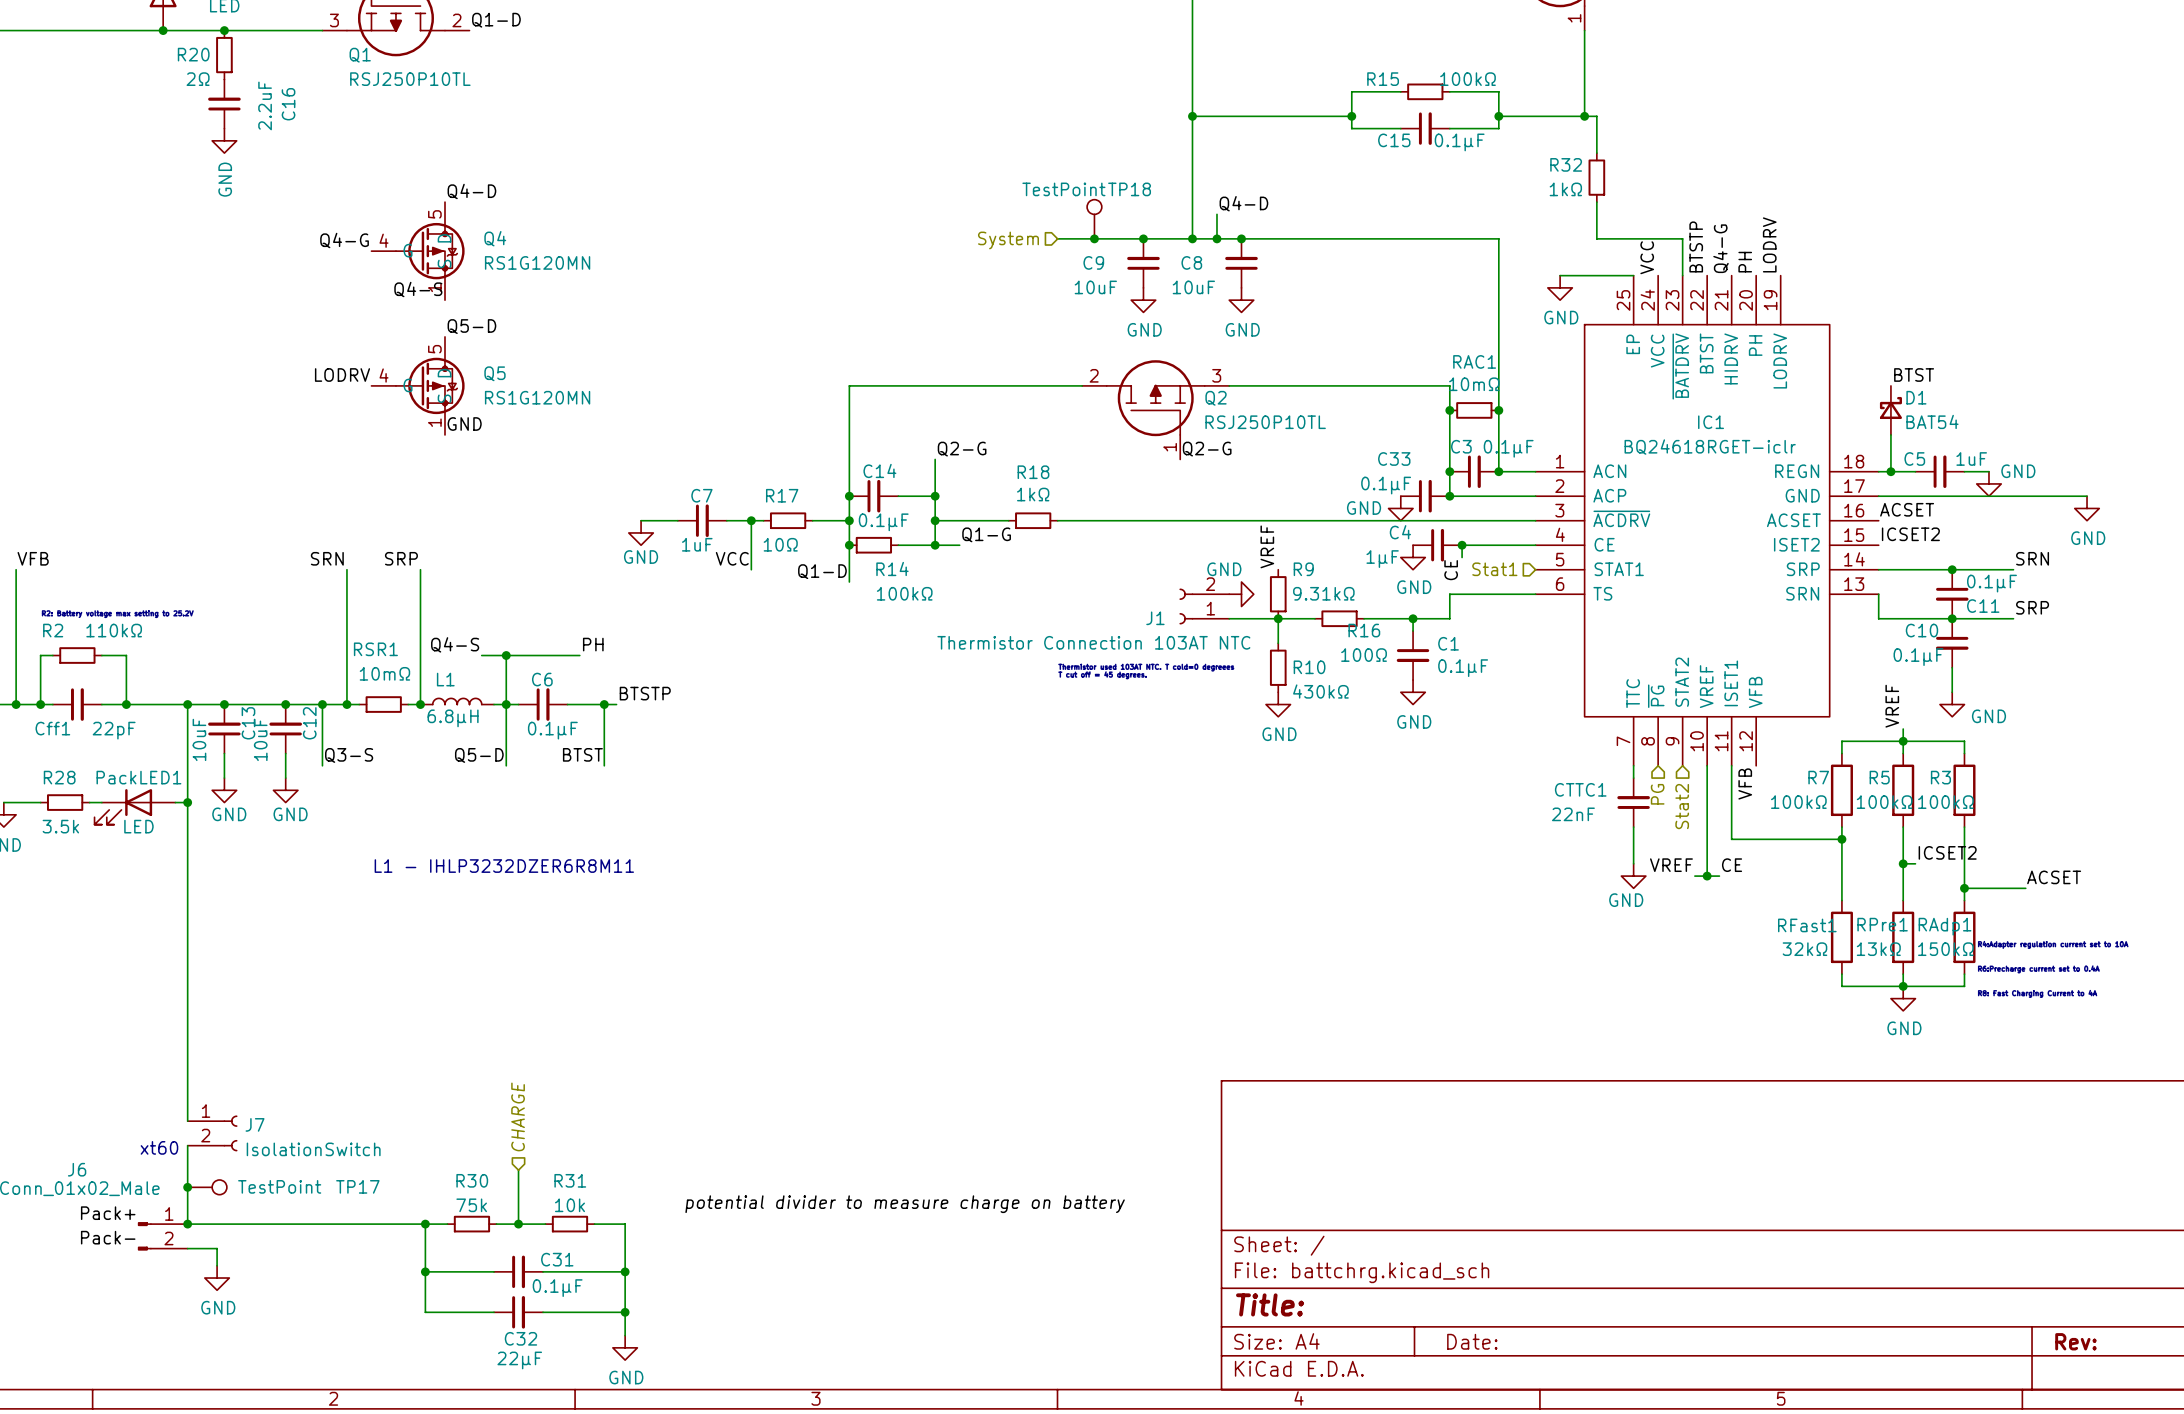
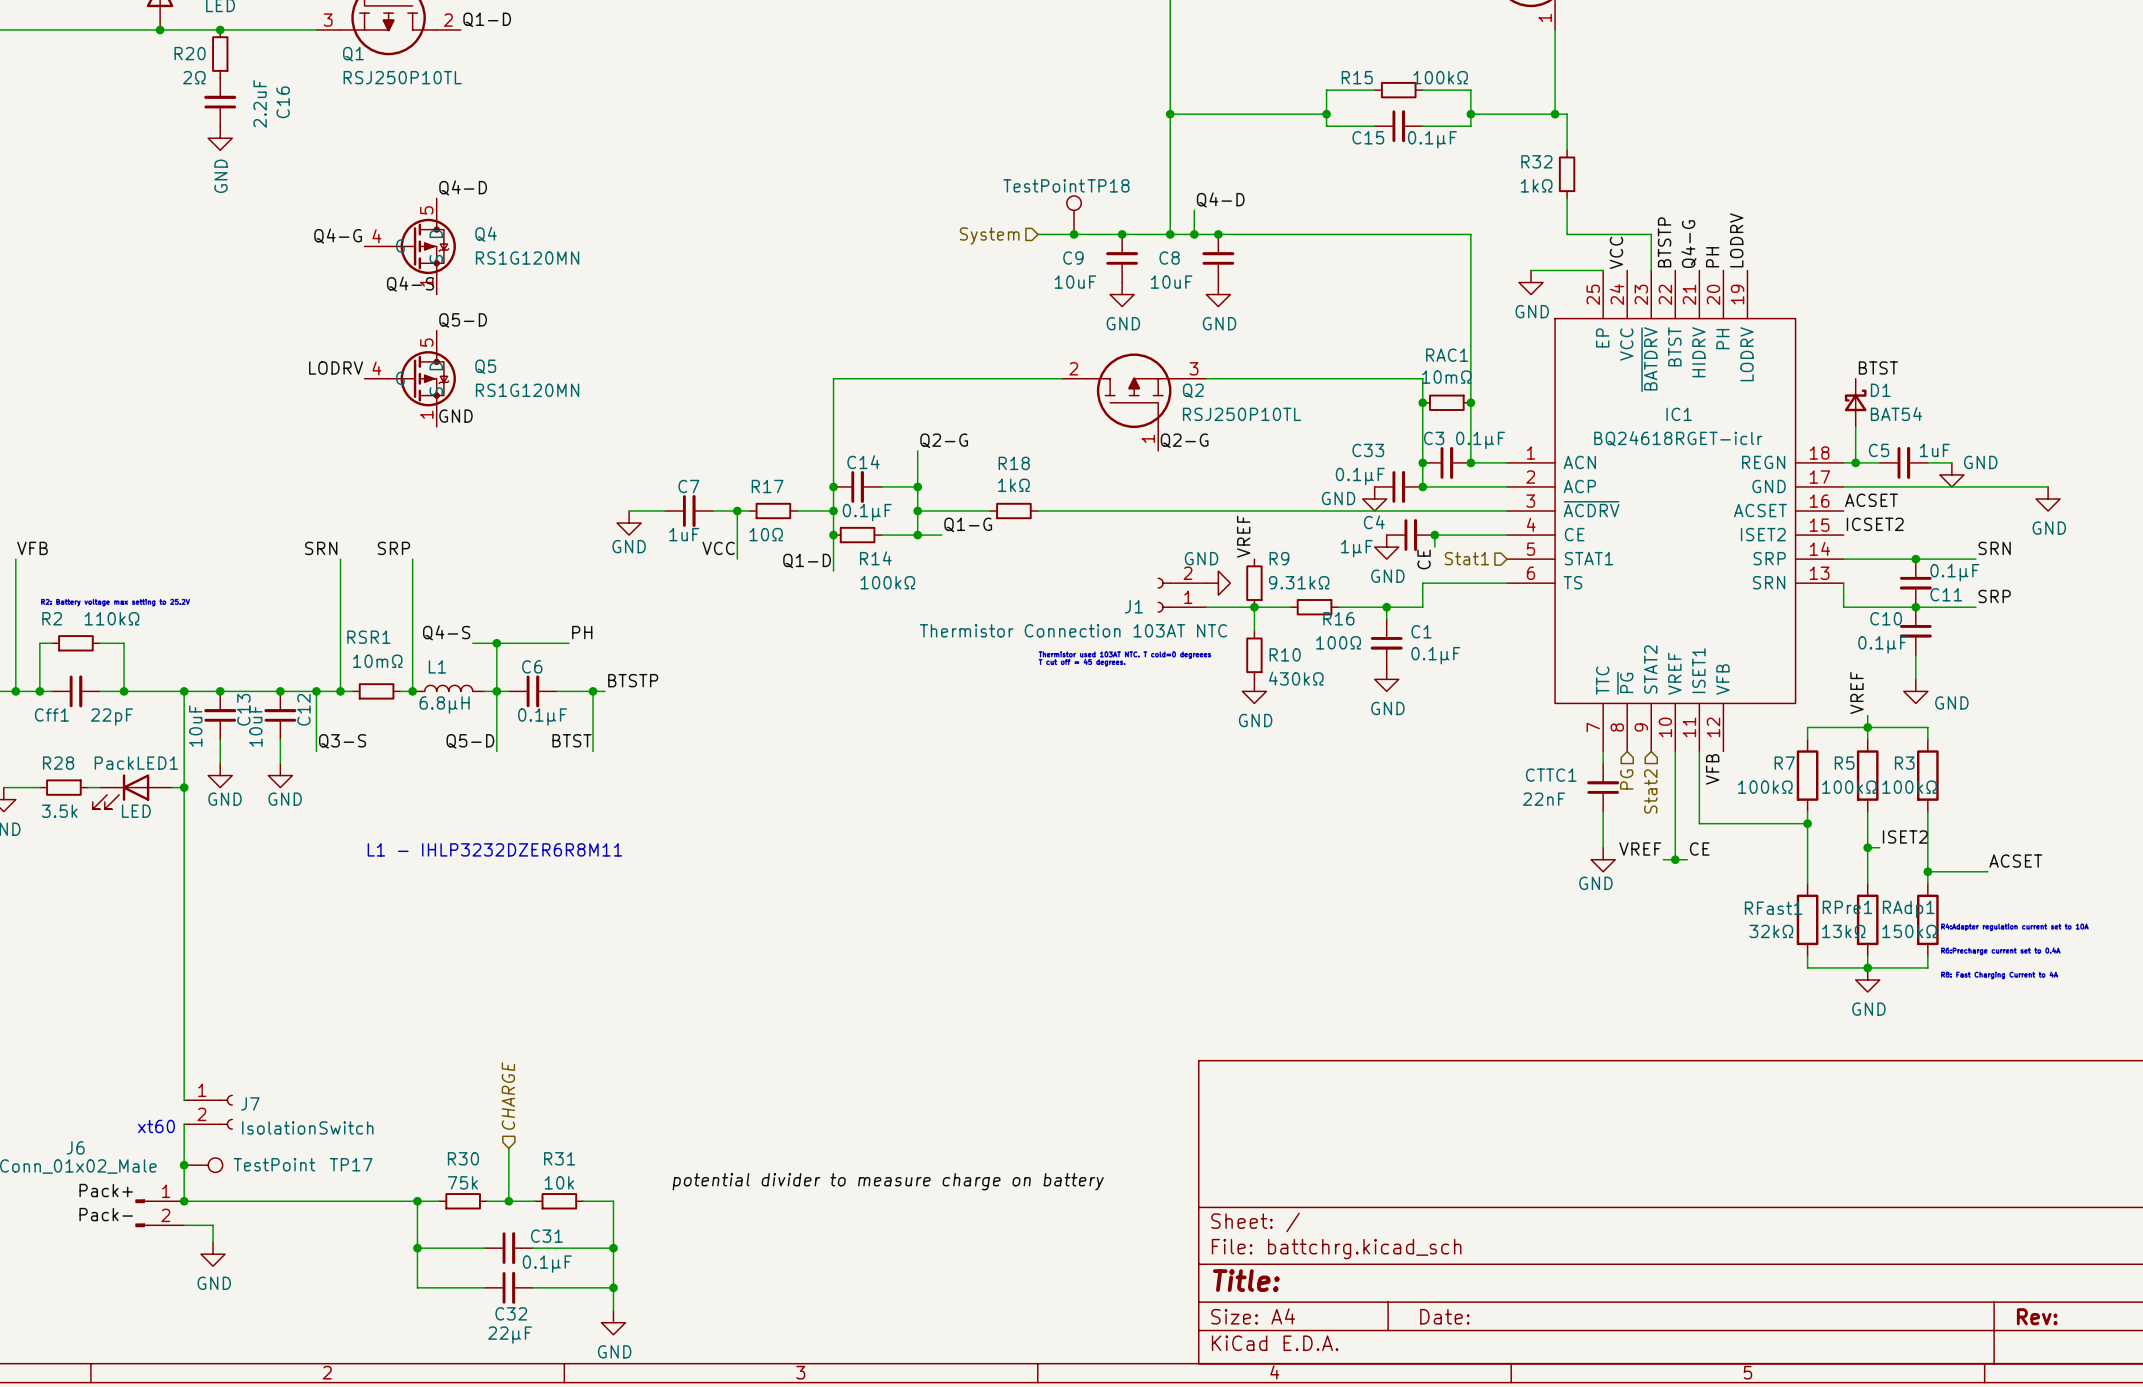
label: ICSET2 (1947, 852) -> ISET2 (1905, 836)

